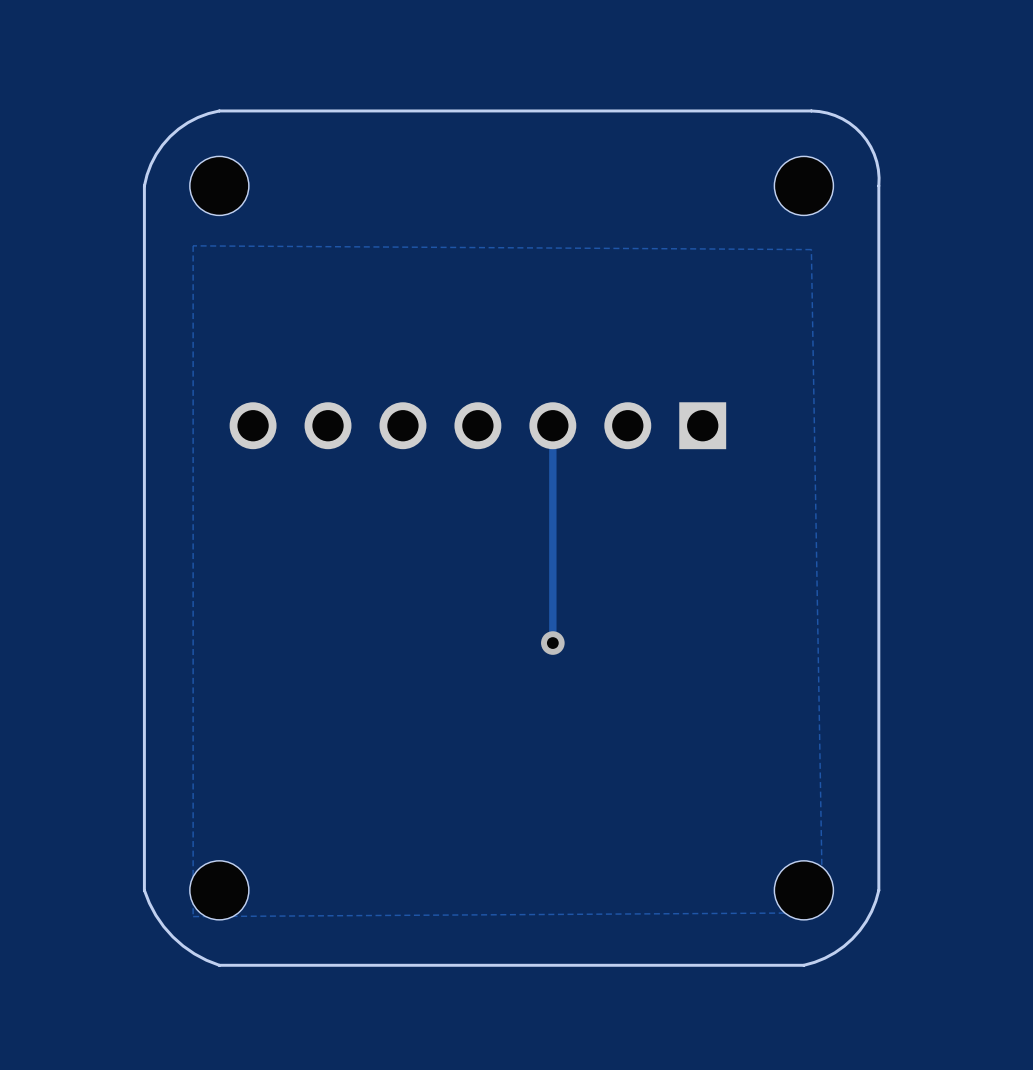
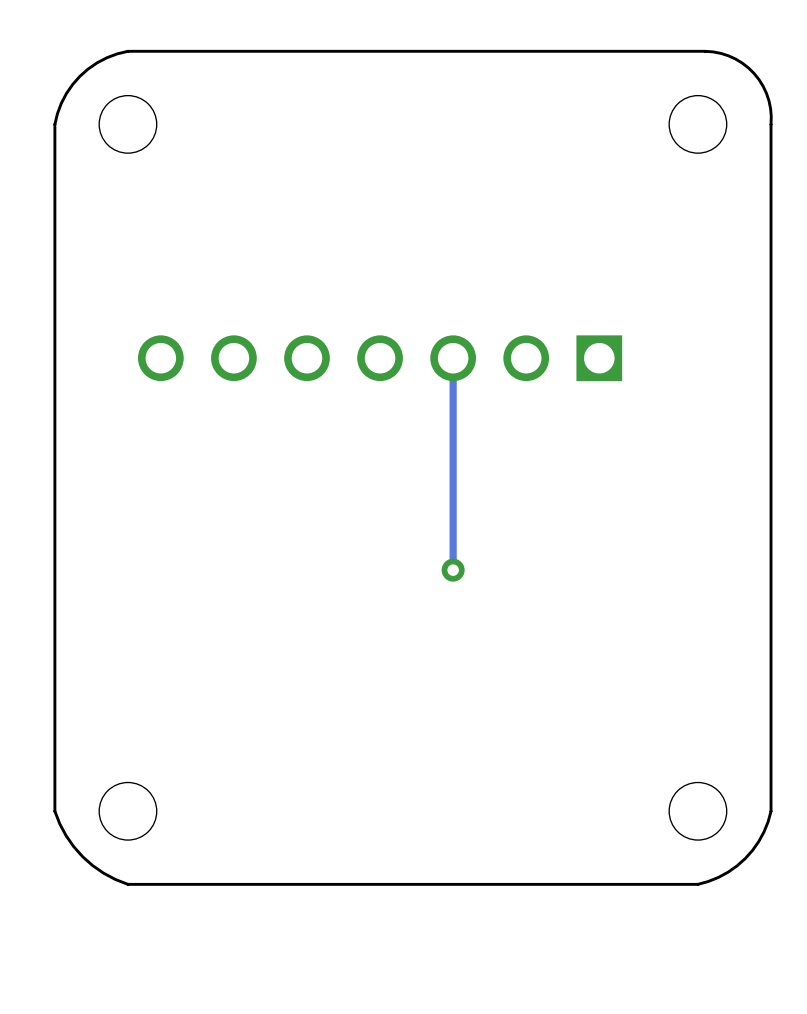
zone outline: (193, 245) (811, 249) (822, 912) (193, 916) (193, 245) -> none

